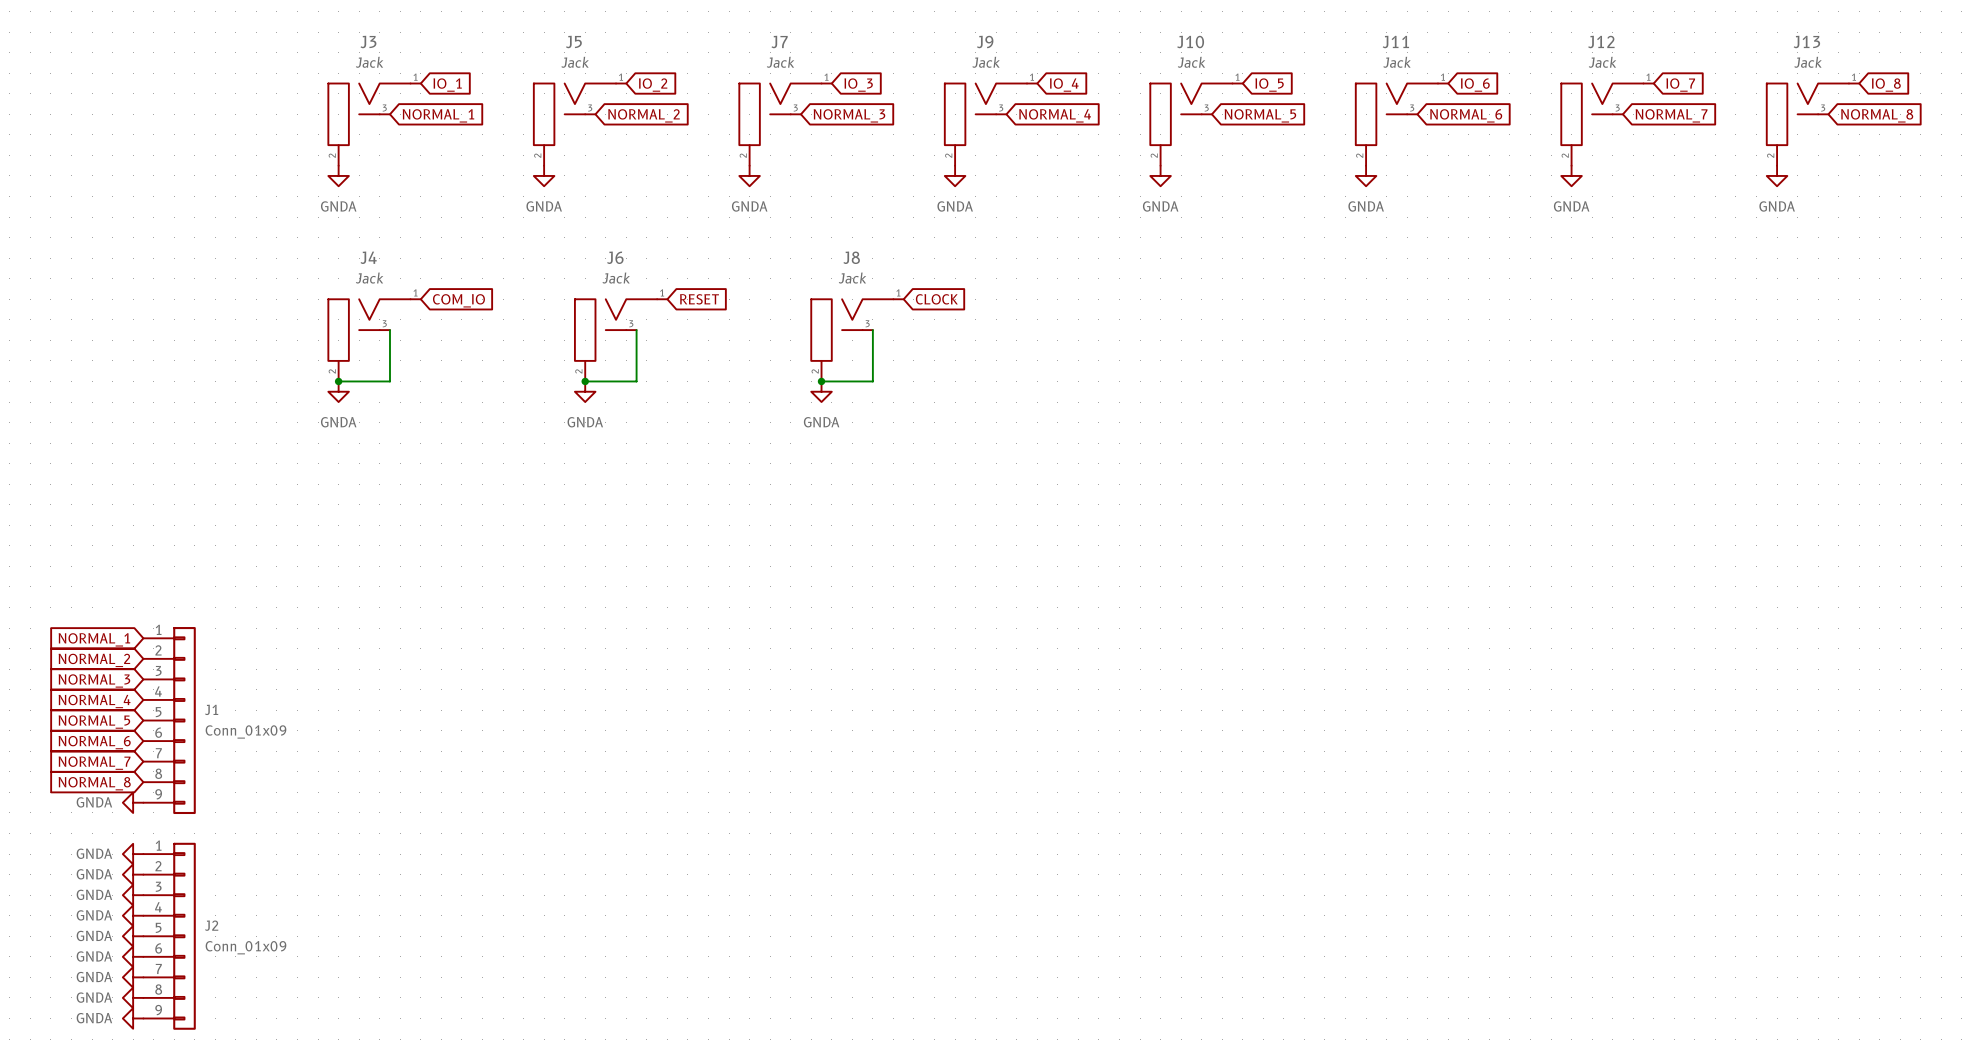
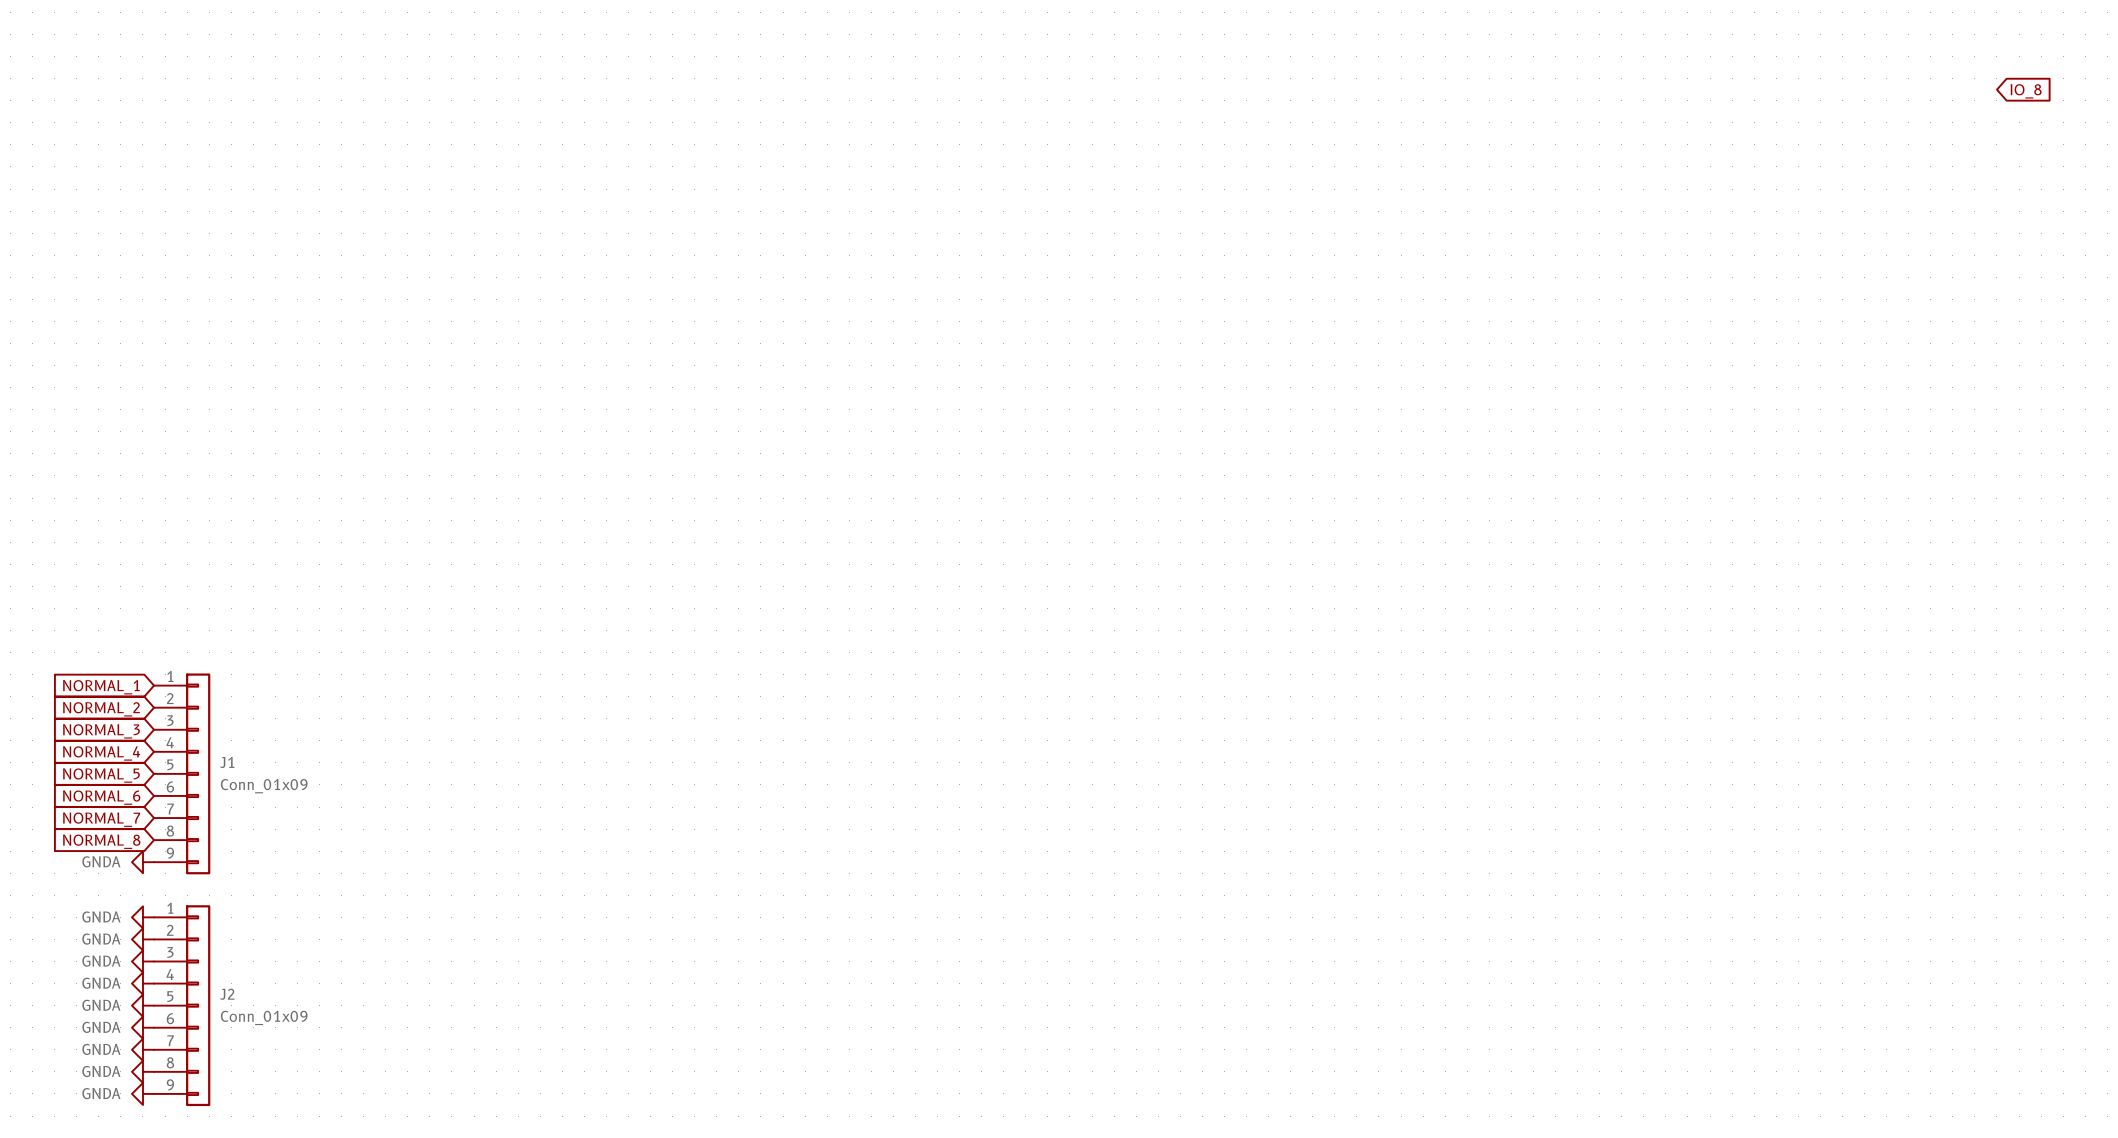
global label: IO_1 (447, 85) -> none
global label: IO_2 (653, 85) -> none
global label: IO_3 (858, 85) -> none
global label: IO_4 (1064, 85) -> none
global label: IO_5 (1269, 85) -> none
global label: IO_6 (1475, 85) -> none
global label: IO_7 (1680, 85) -> none
global label: NORMAL_1 (438, 115) -> none
global label: NORMAL_2 (643, 115) -> none
global label: NORMAL_3 (849, 115) -> none
global label: NORMAL_4 (1055, 115) -> none
global label: NORMAL_5 (1260, 115) -> none
global label: NORMAL_6 (1466, 115) -> none
global label: NORMAL_7 (1671, 115) -> none
global label: NORMAL_8 (1877, 115) -> none
J3: (374, 124) -> none
J5: (580, 124) -> none
J7: (785, 124) -> none
J9: (991, 124) -> none
J10: (1196, 124) -> none
J11: (1402, 124) -> none
J12: (1607, 124) -> none
J13: (1813, 124) -> none
power symbol: GNDA (338, 175) -> none
power symbol: GNDA (544, 175) -> none
power symbol: GNDA (749, 175) -> none
power symbol: GNDA (955, 175) -> none
power symbol: GNDA (1160, 175) -> none
power symbol: GNDA (1366, 175) -> none
power symbol: GNDA (1571, 175) -> none
power symbol: GNDA (1777, 175) -> none
global label: RESET (699, 299) -> none
global label: CLOCK (936, 299) -> none
global label: COM_IO (458, 300) -> none
wire: (389, 330) (389, 381) (338, 381) -> none
wire: (636, 330) (636, 381) (585, 381) -> none
wire: (872, 330) (872, 381) (821, 381) -> none
J4: (374, 340) -> none
J6: (621, 340) -> none
J8: (857, 340) -> none
junction: (338, 381) -> none
junction: (585, 381) -> none
junction: (821, 381) -> none
power symbol: GNDA (338, 391) -> none
power symbol: GNDA (585, 391) -> none
power symbol: GNDA (821, 391) -> none

